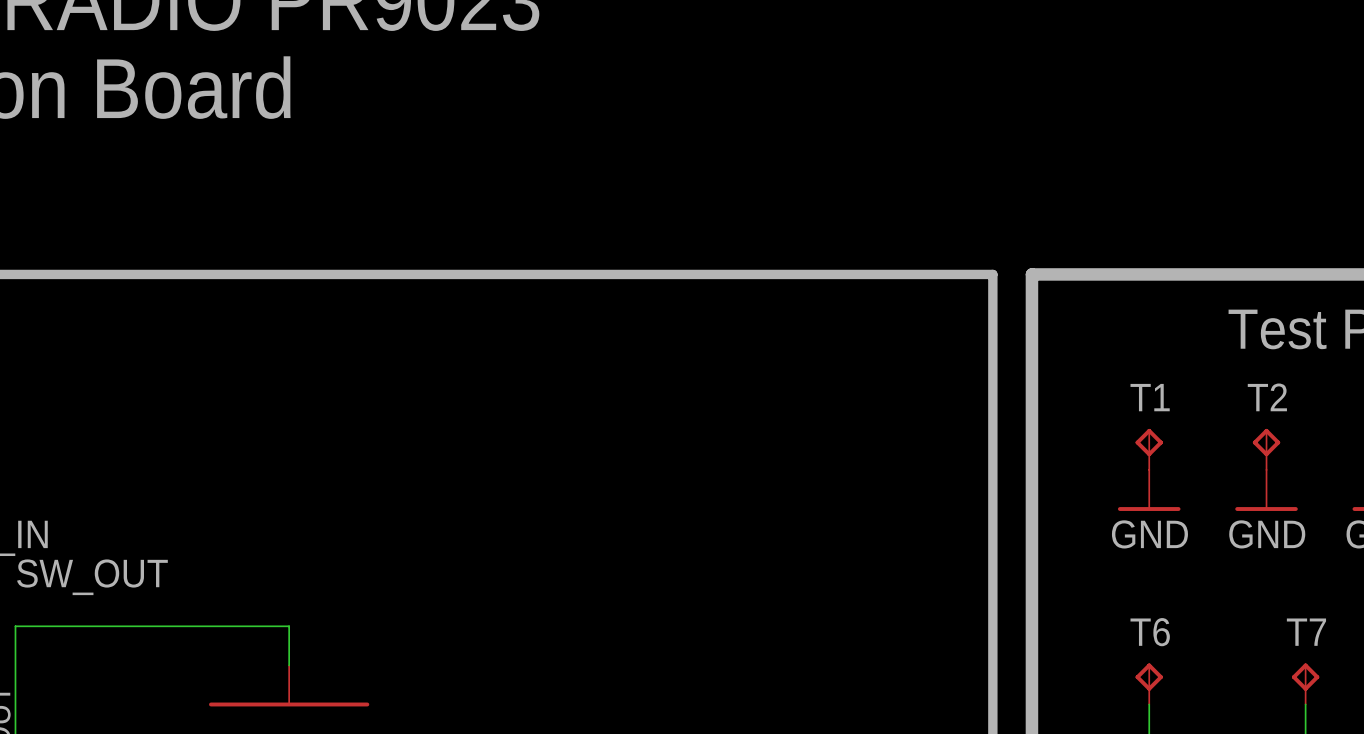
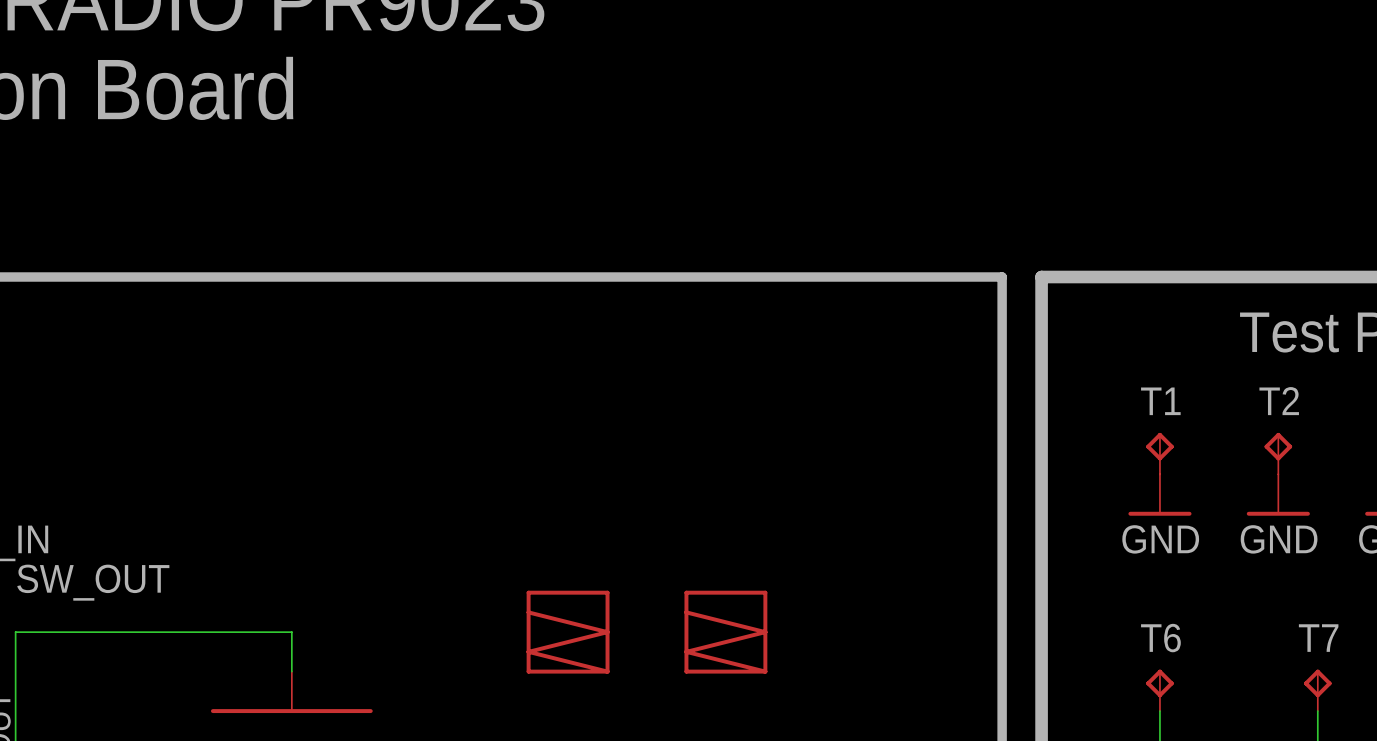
part: none -> (568, 632)
part: none -> (725, 632)

